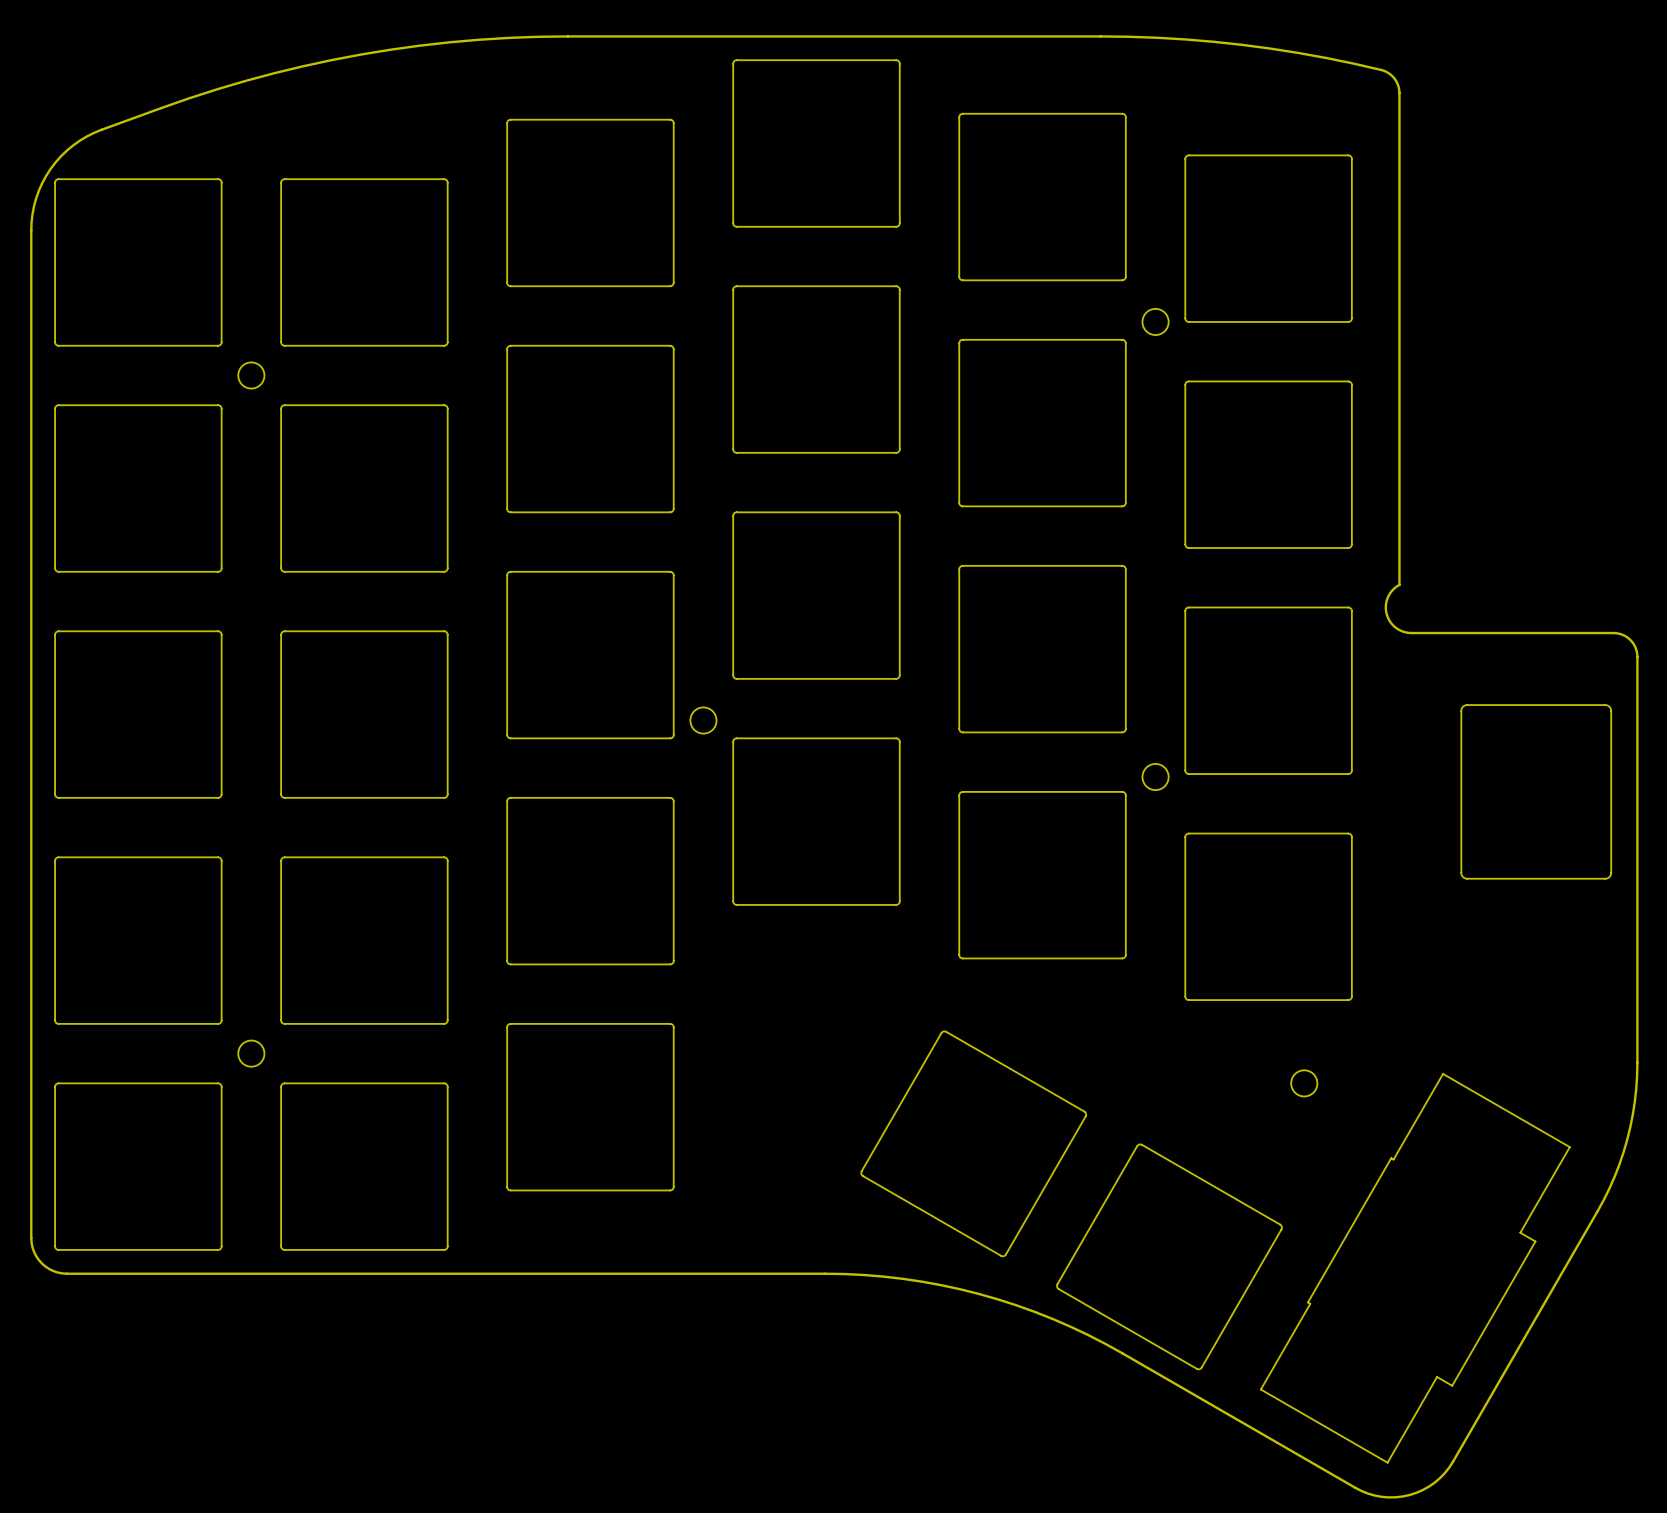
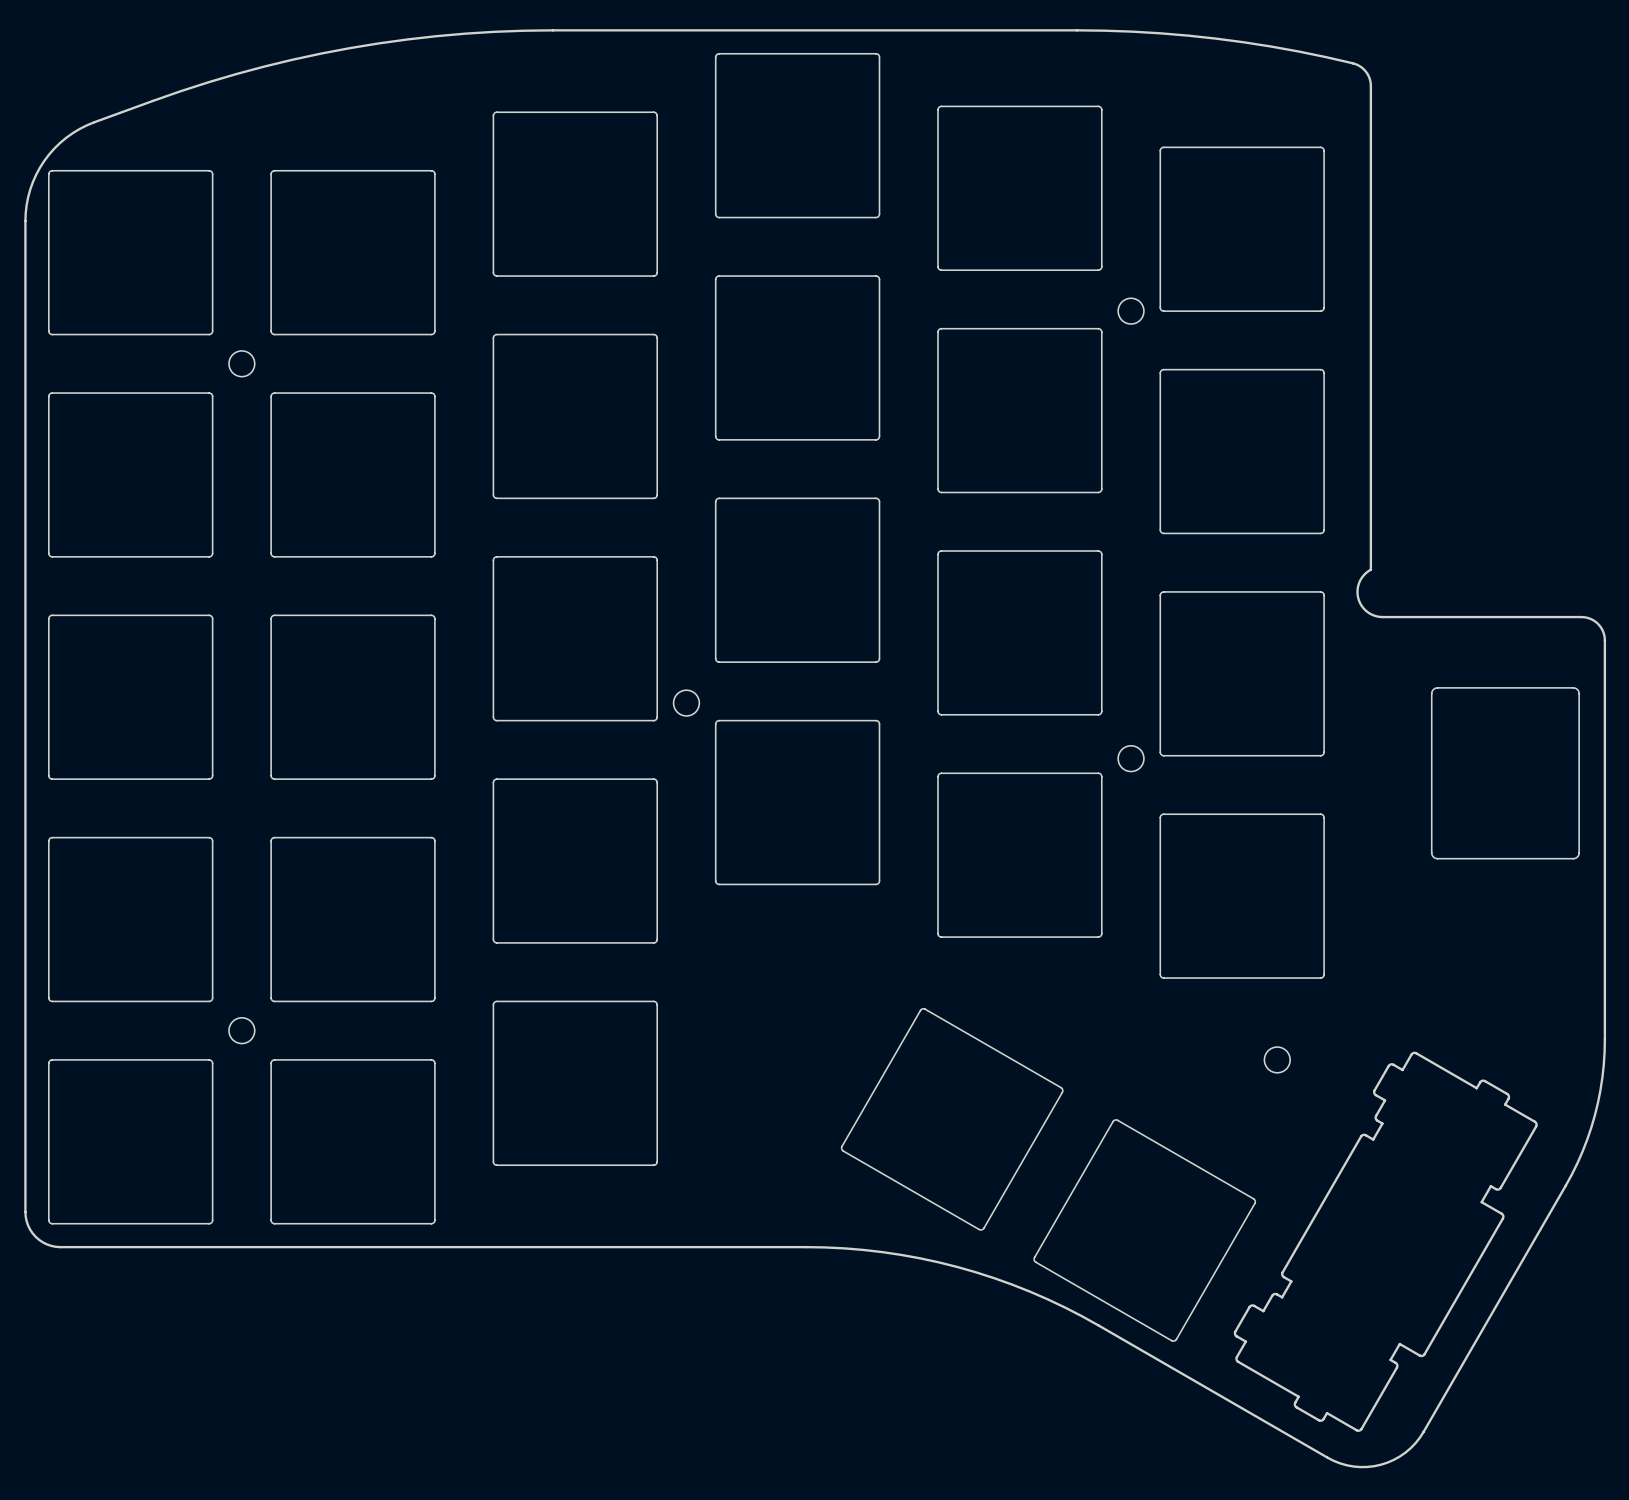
drawing shape: [1260, 1073, 1571, 1464] -> [1233, 1051, 1538, 1432]

